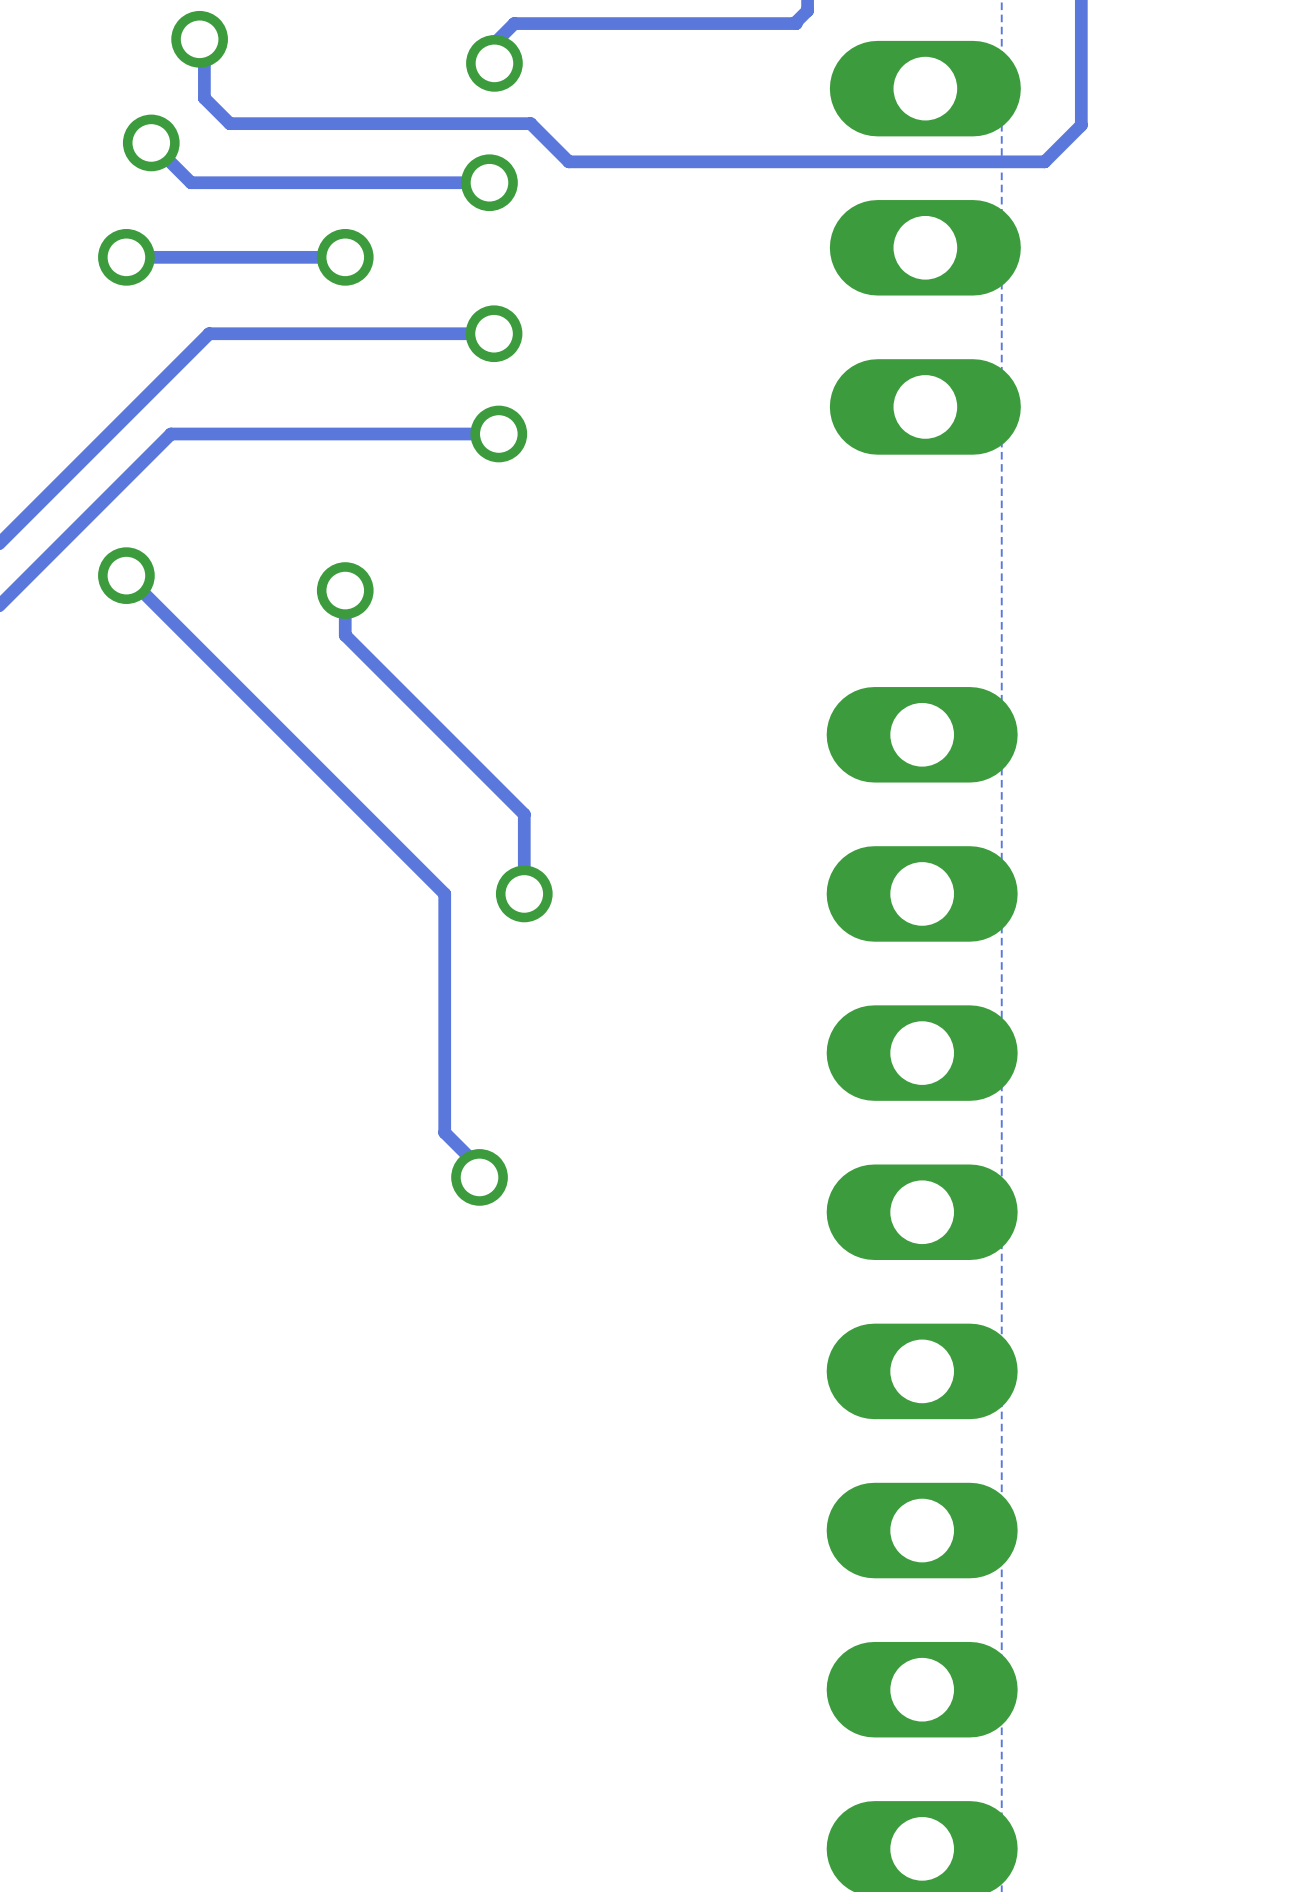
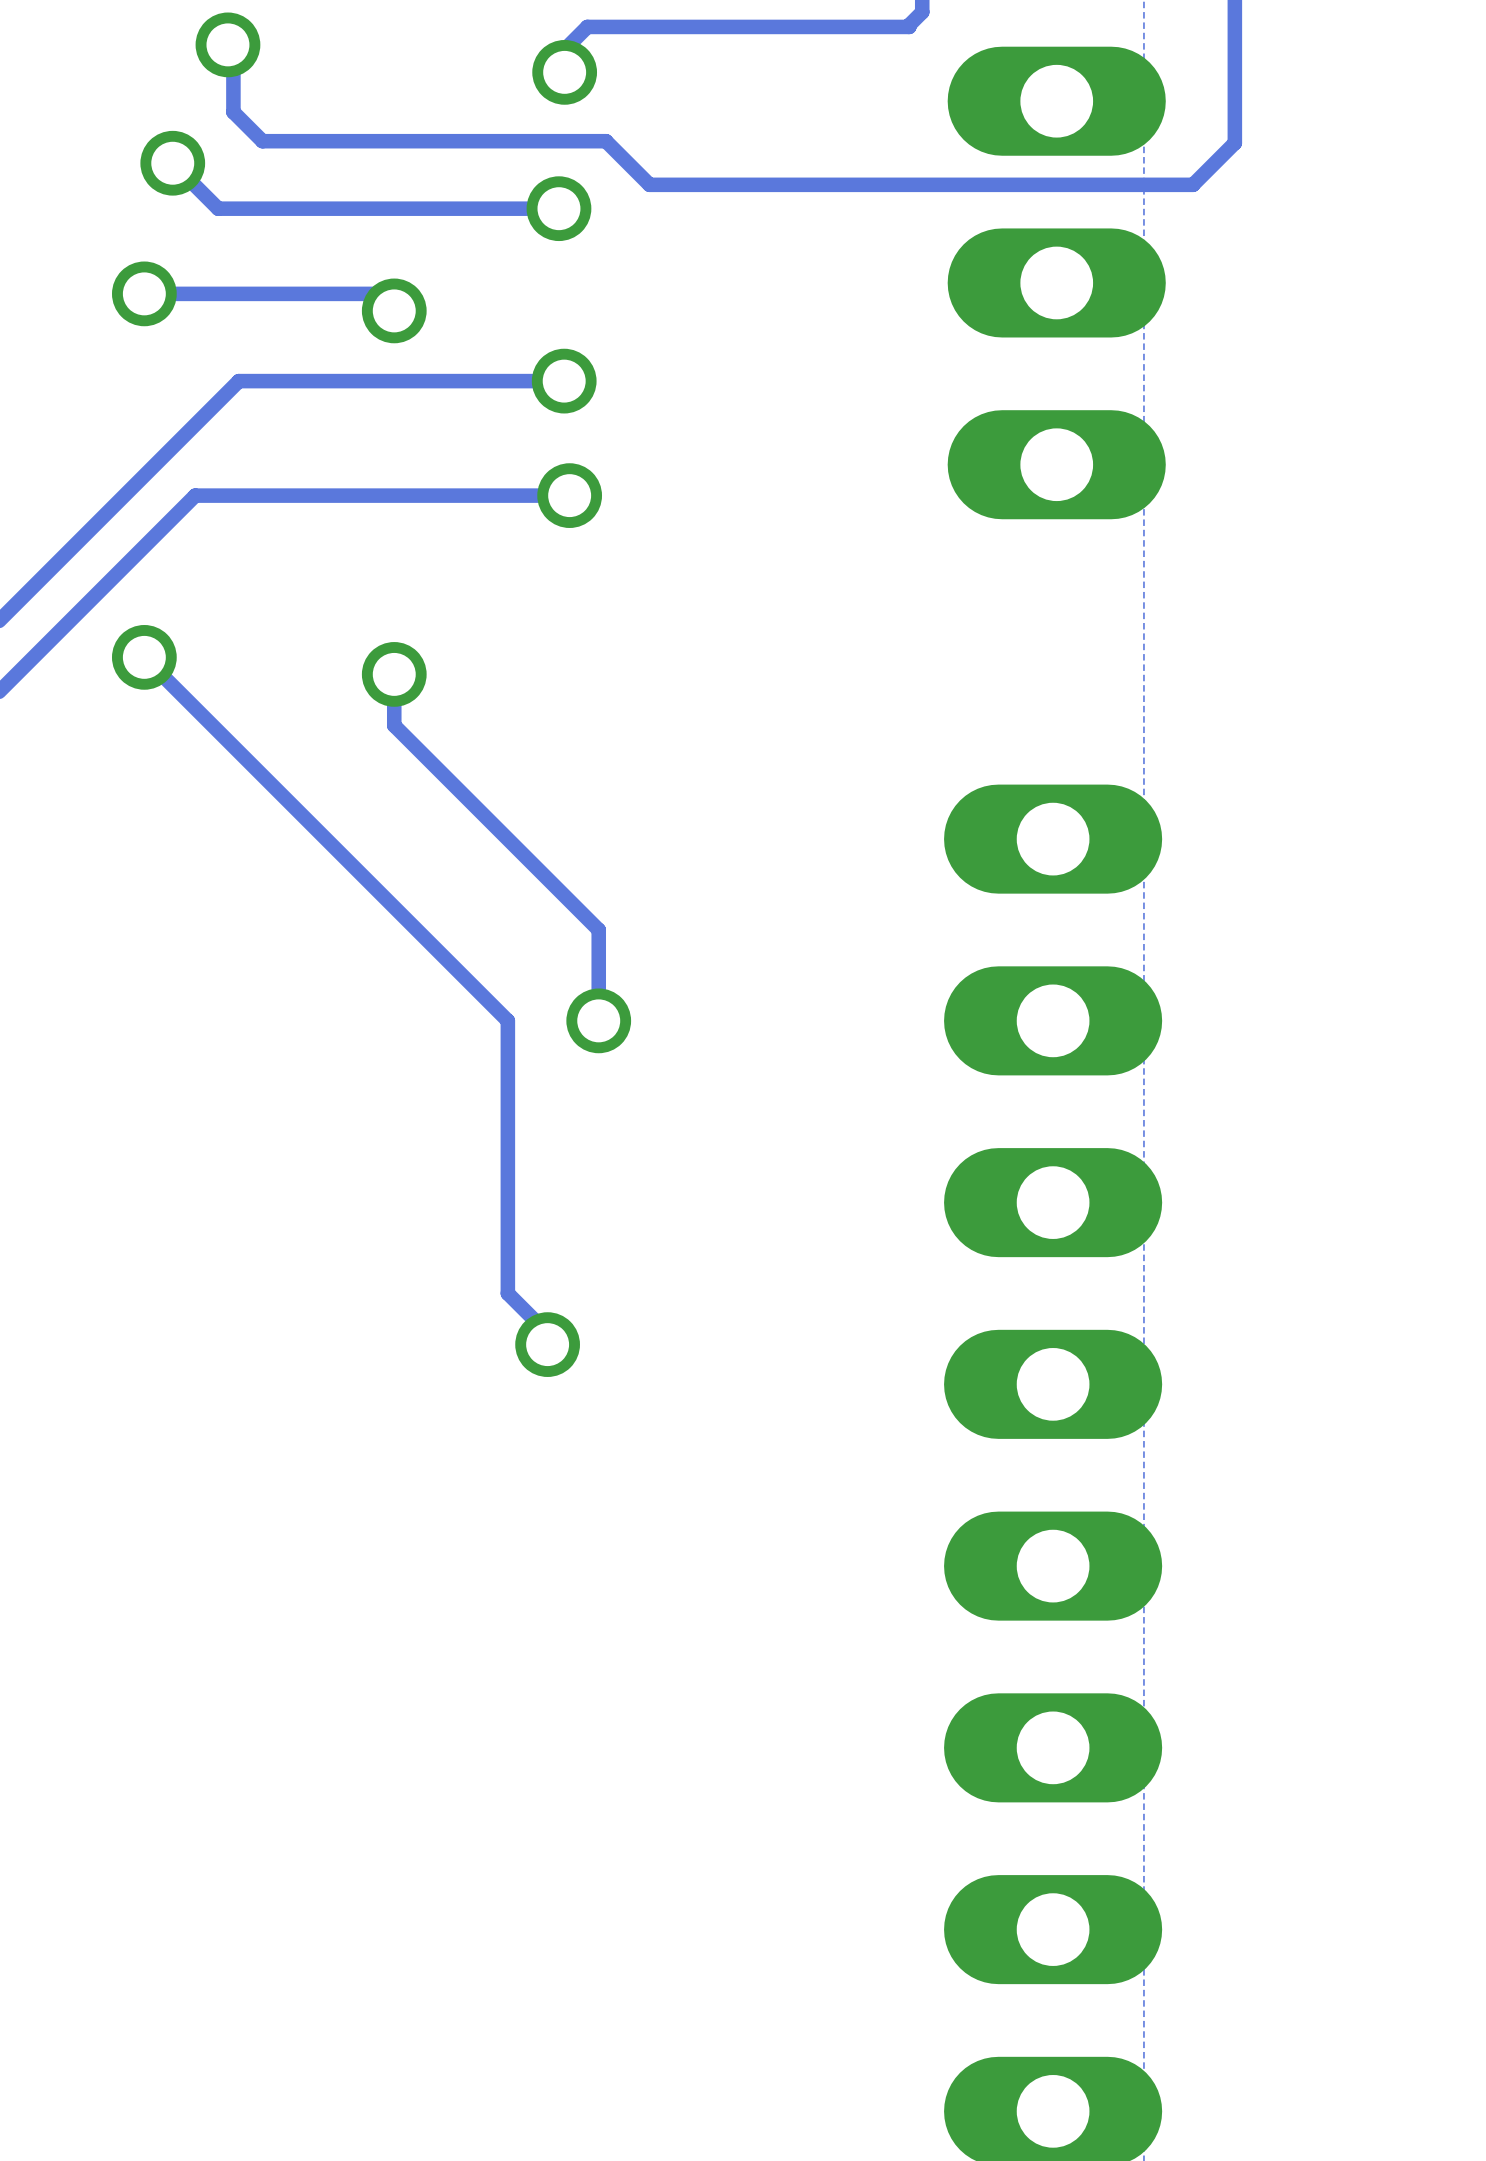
via position: (345, 257) -> (394, 310)

